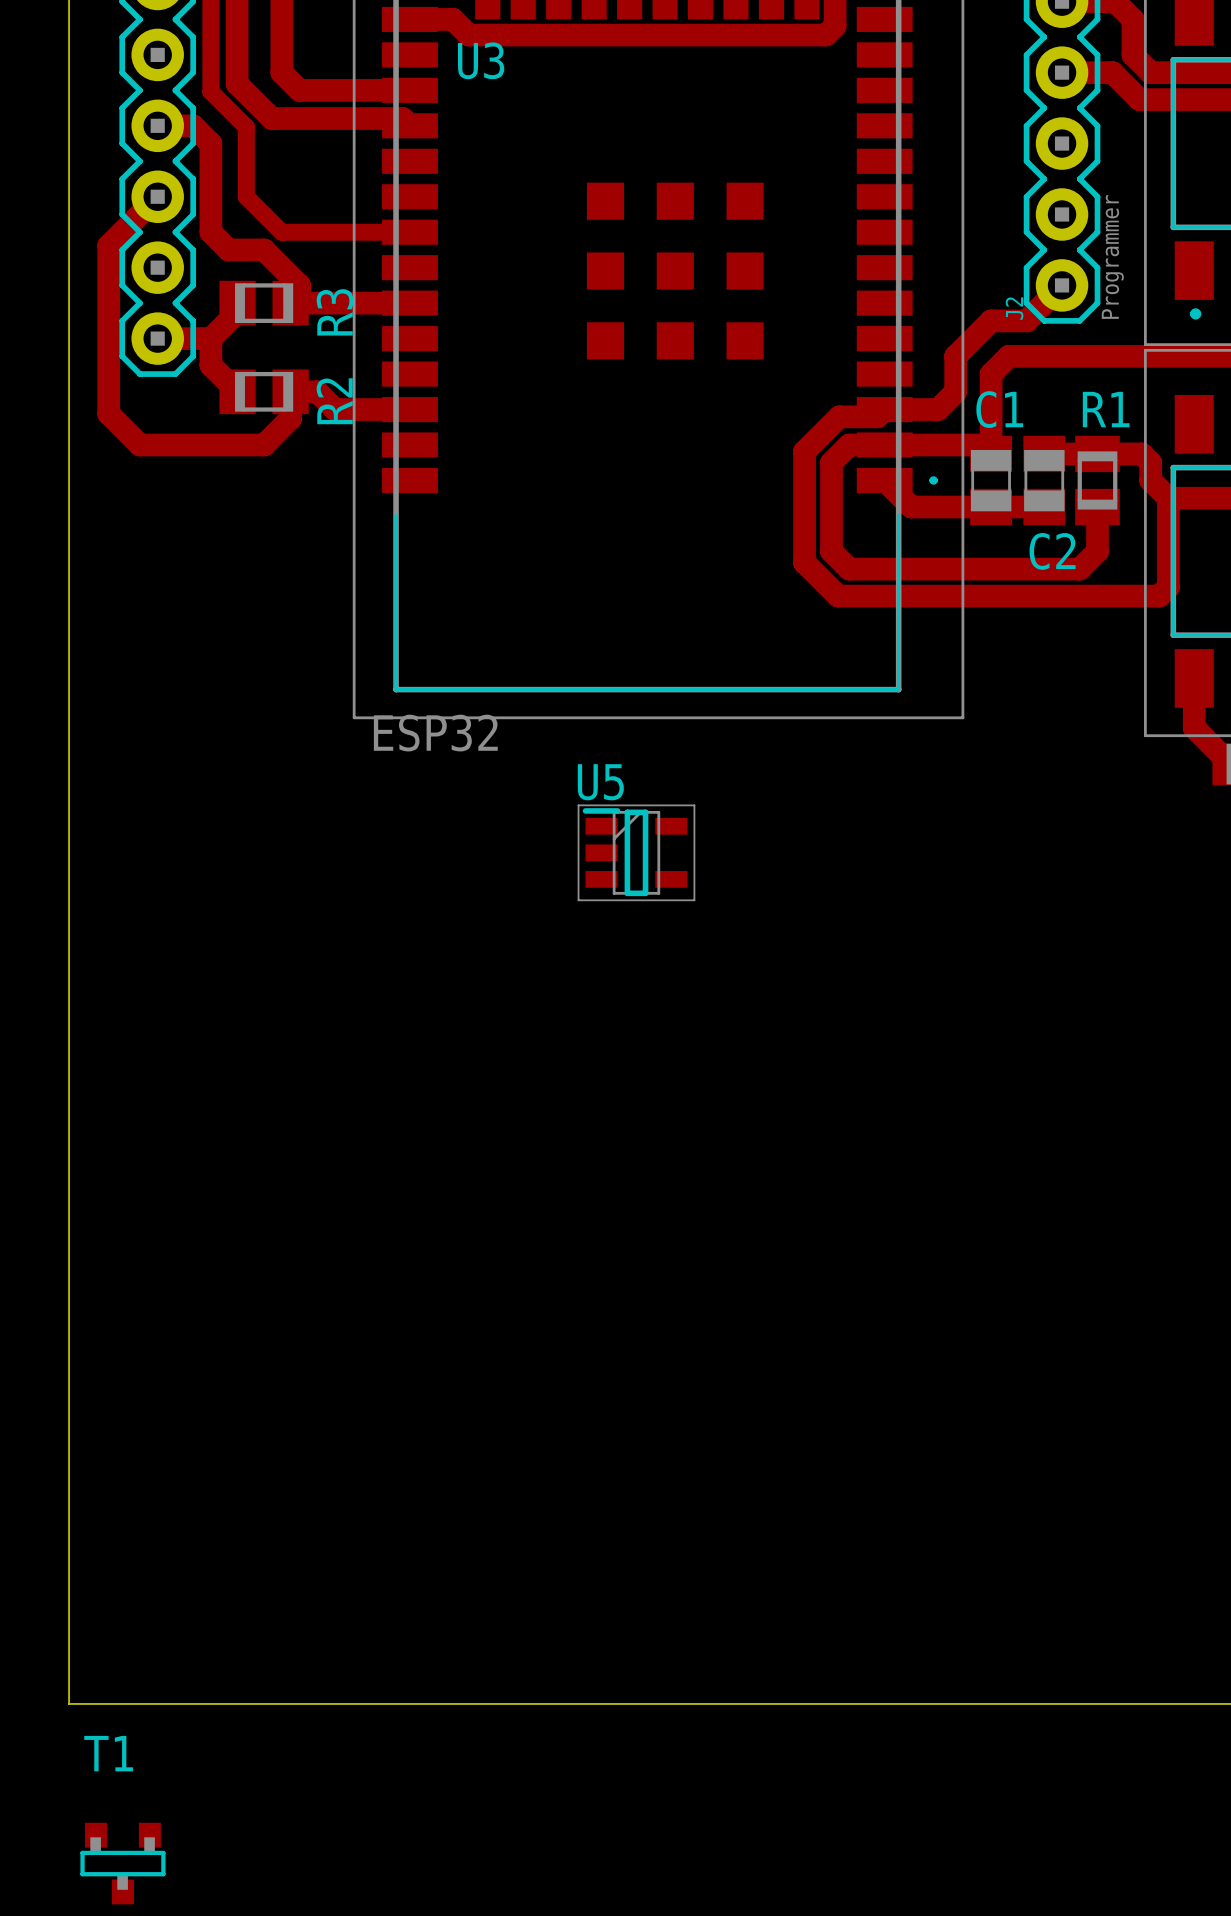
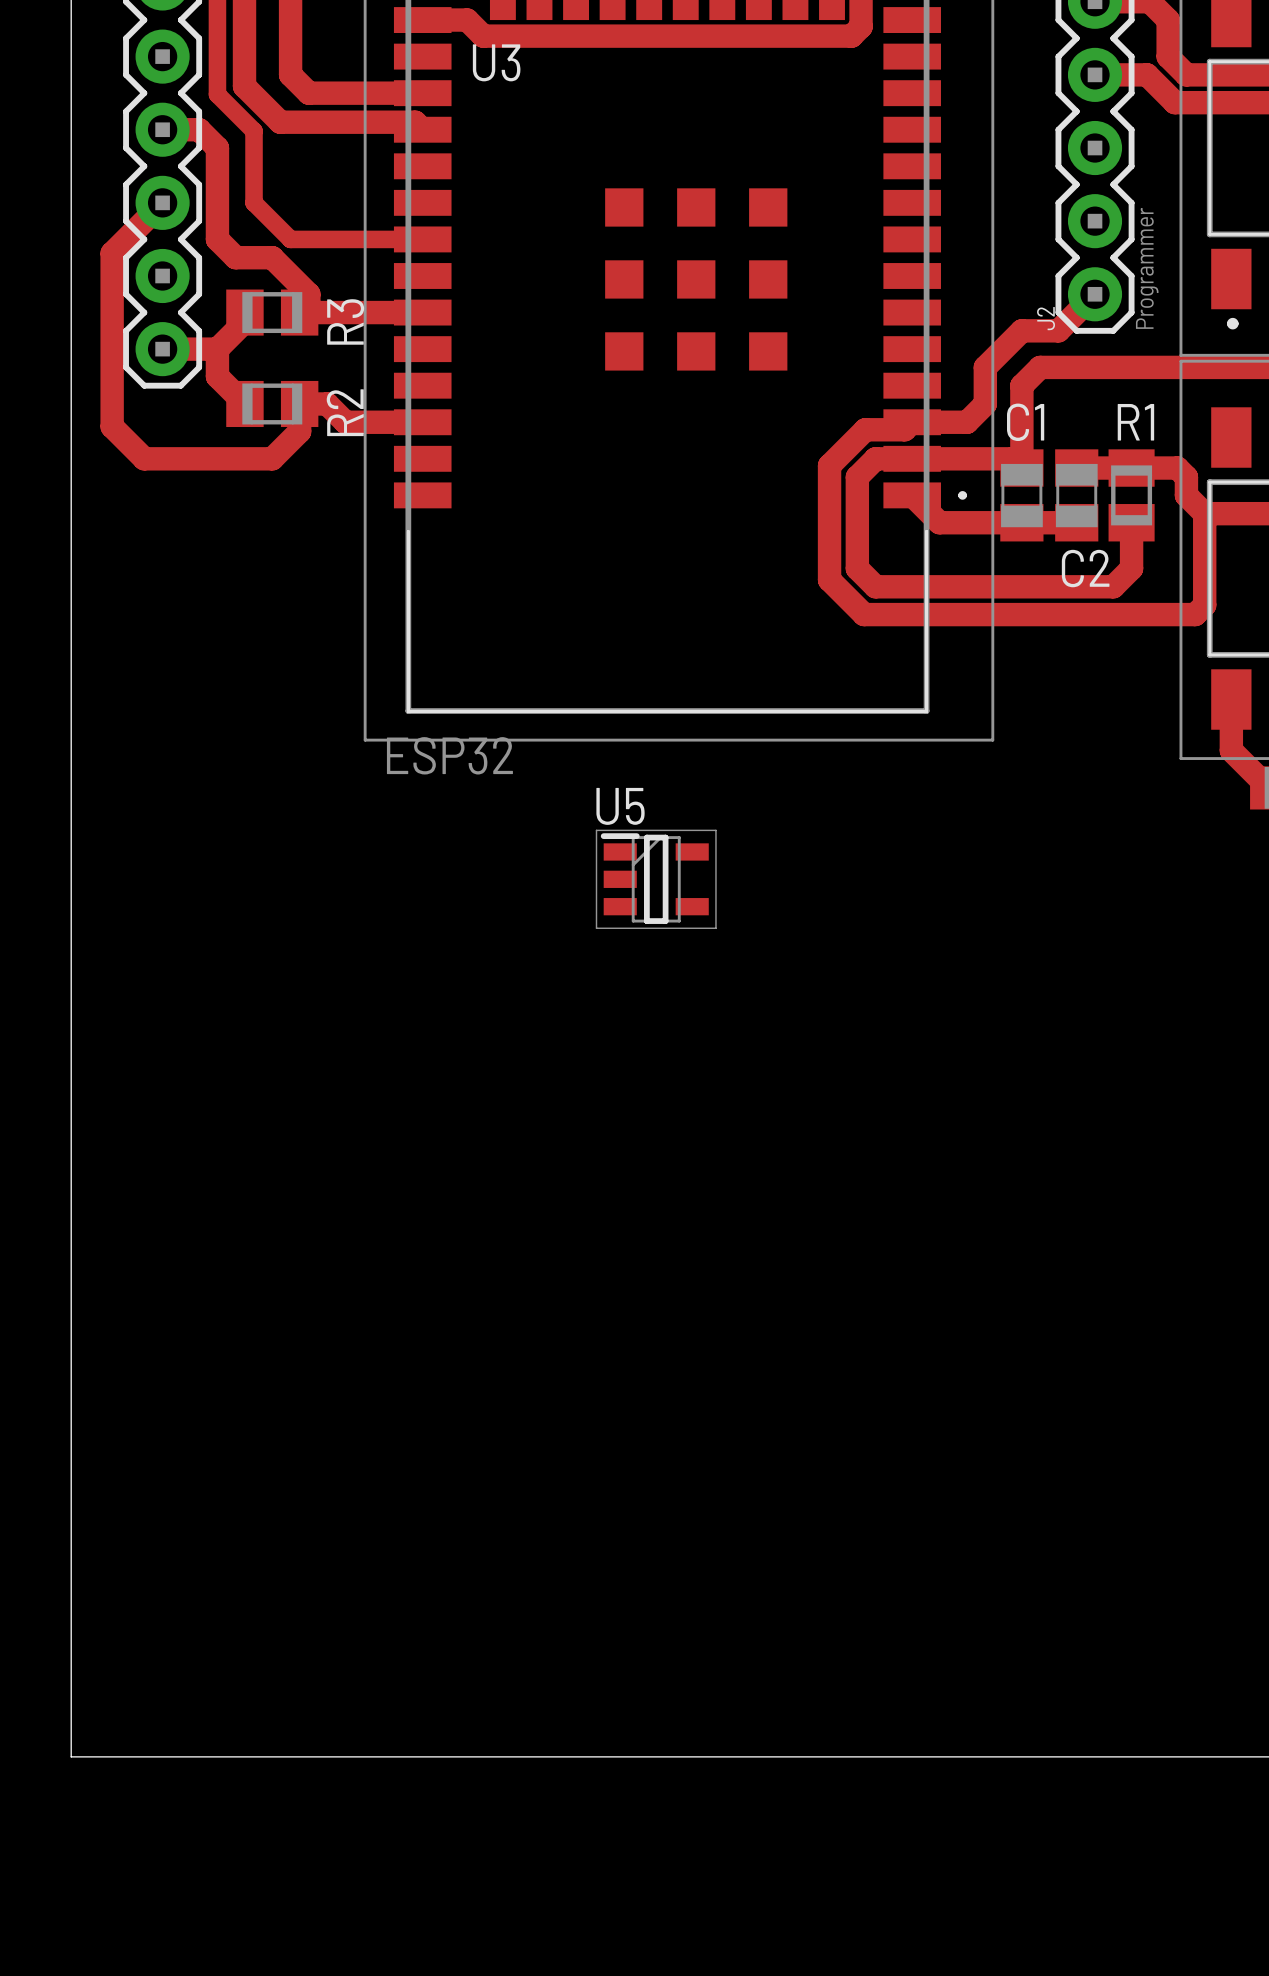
T1: (122, 1863) -> none

